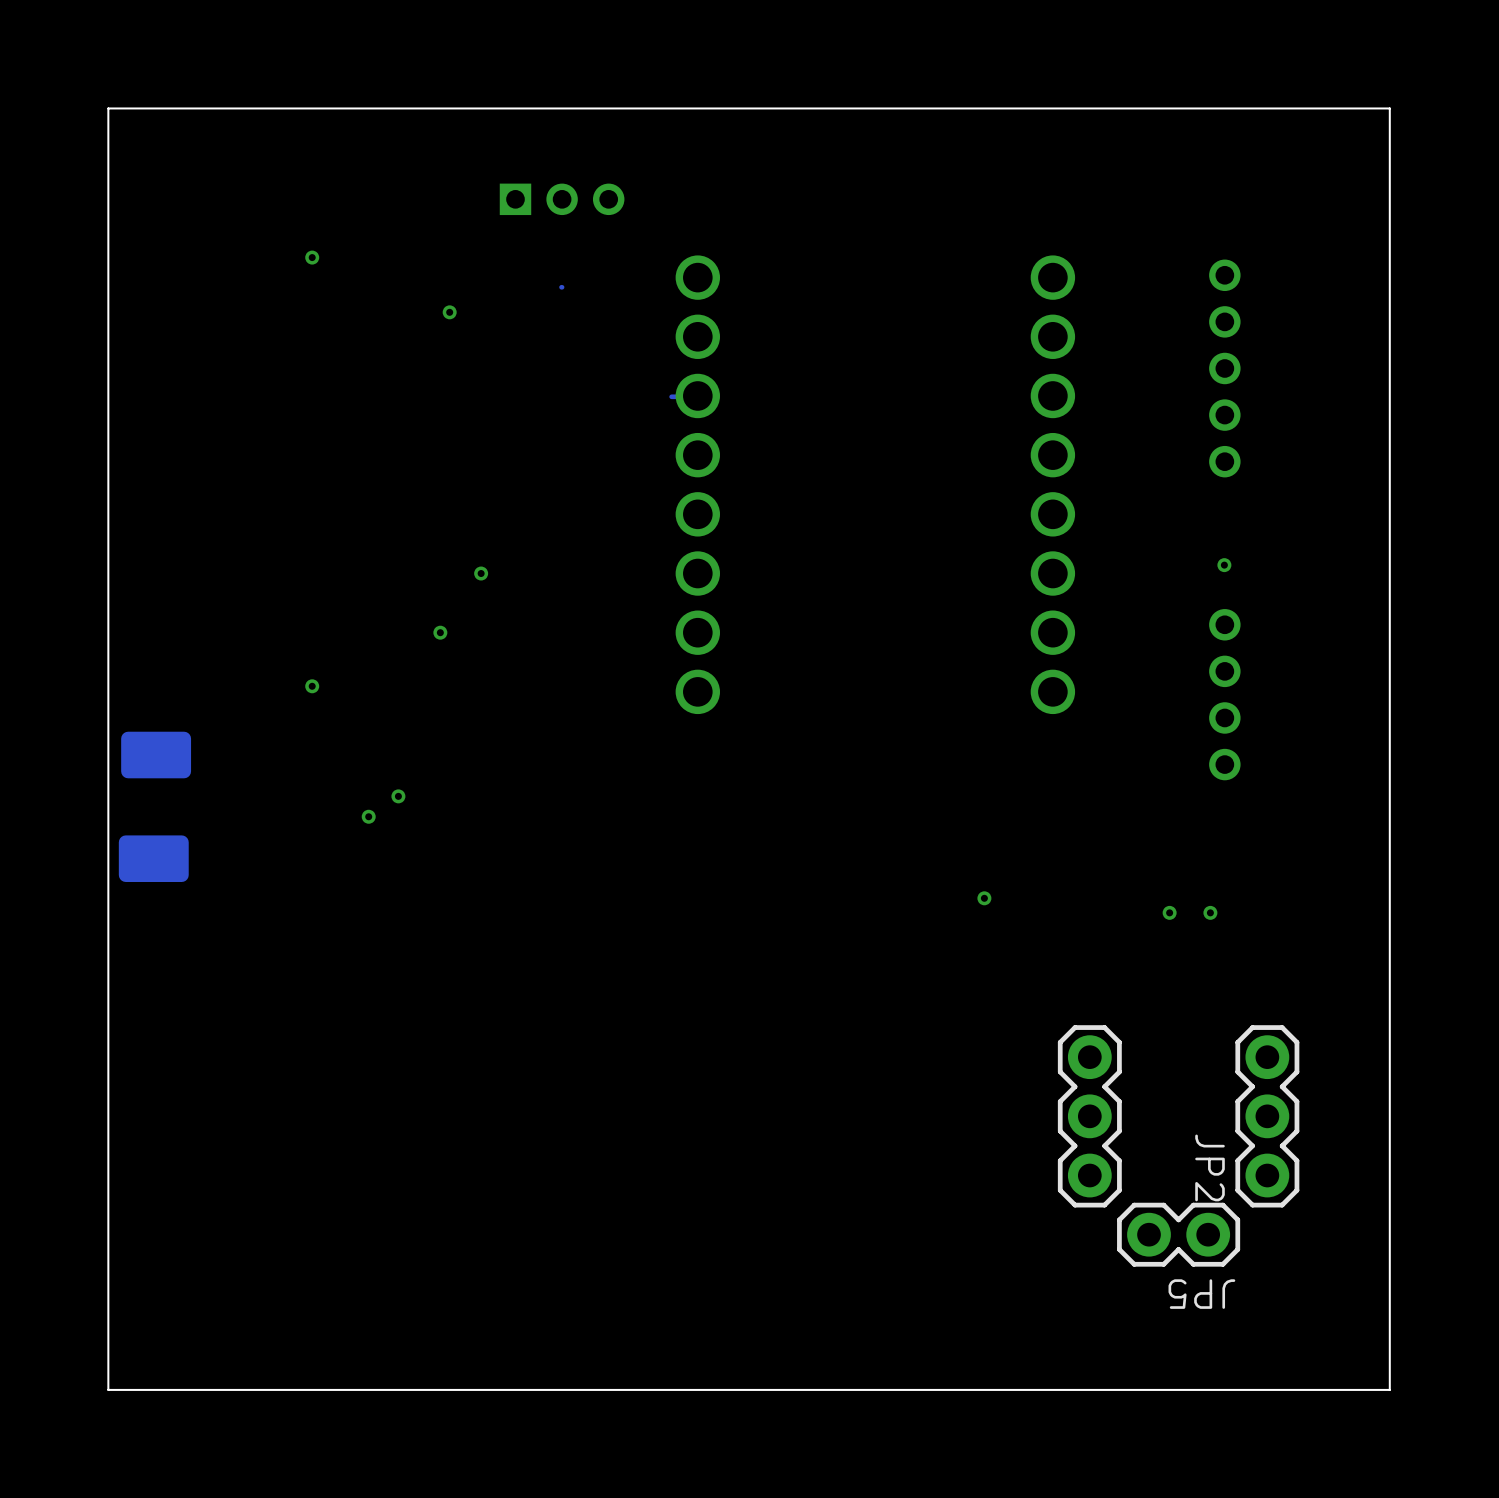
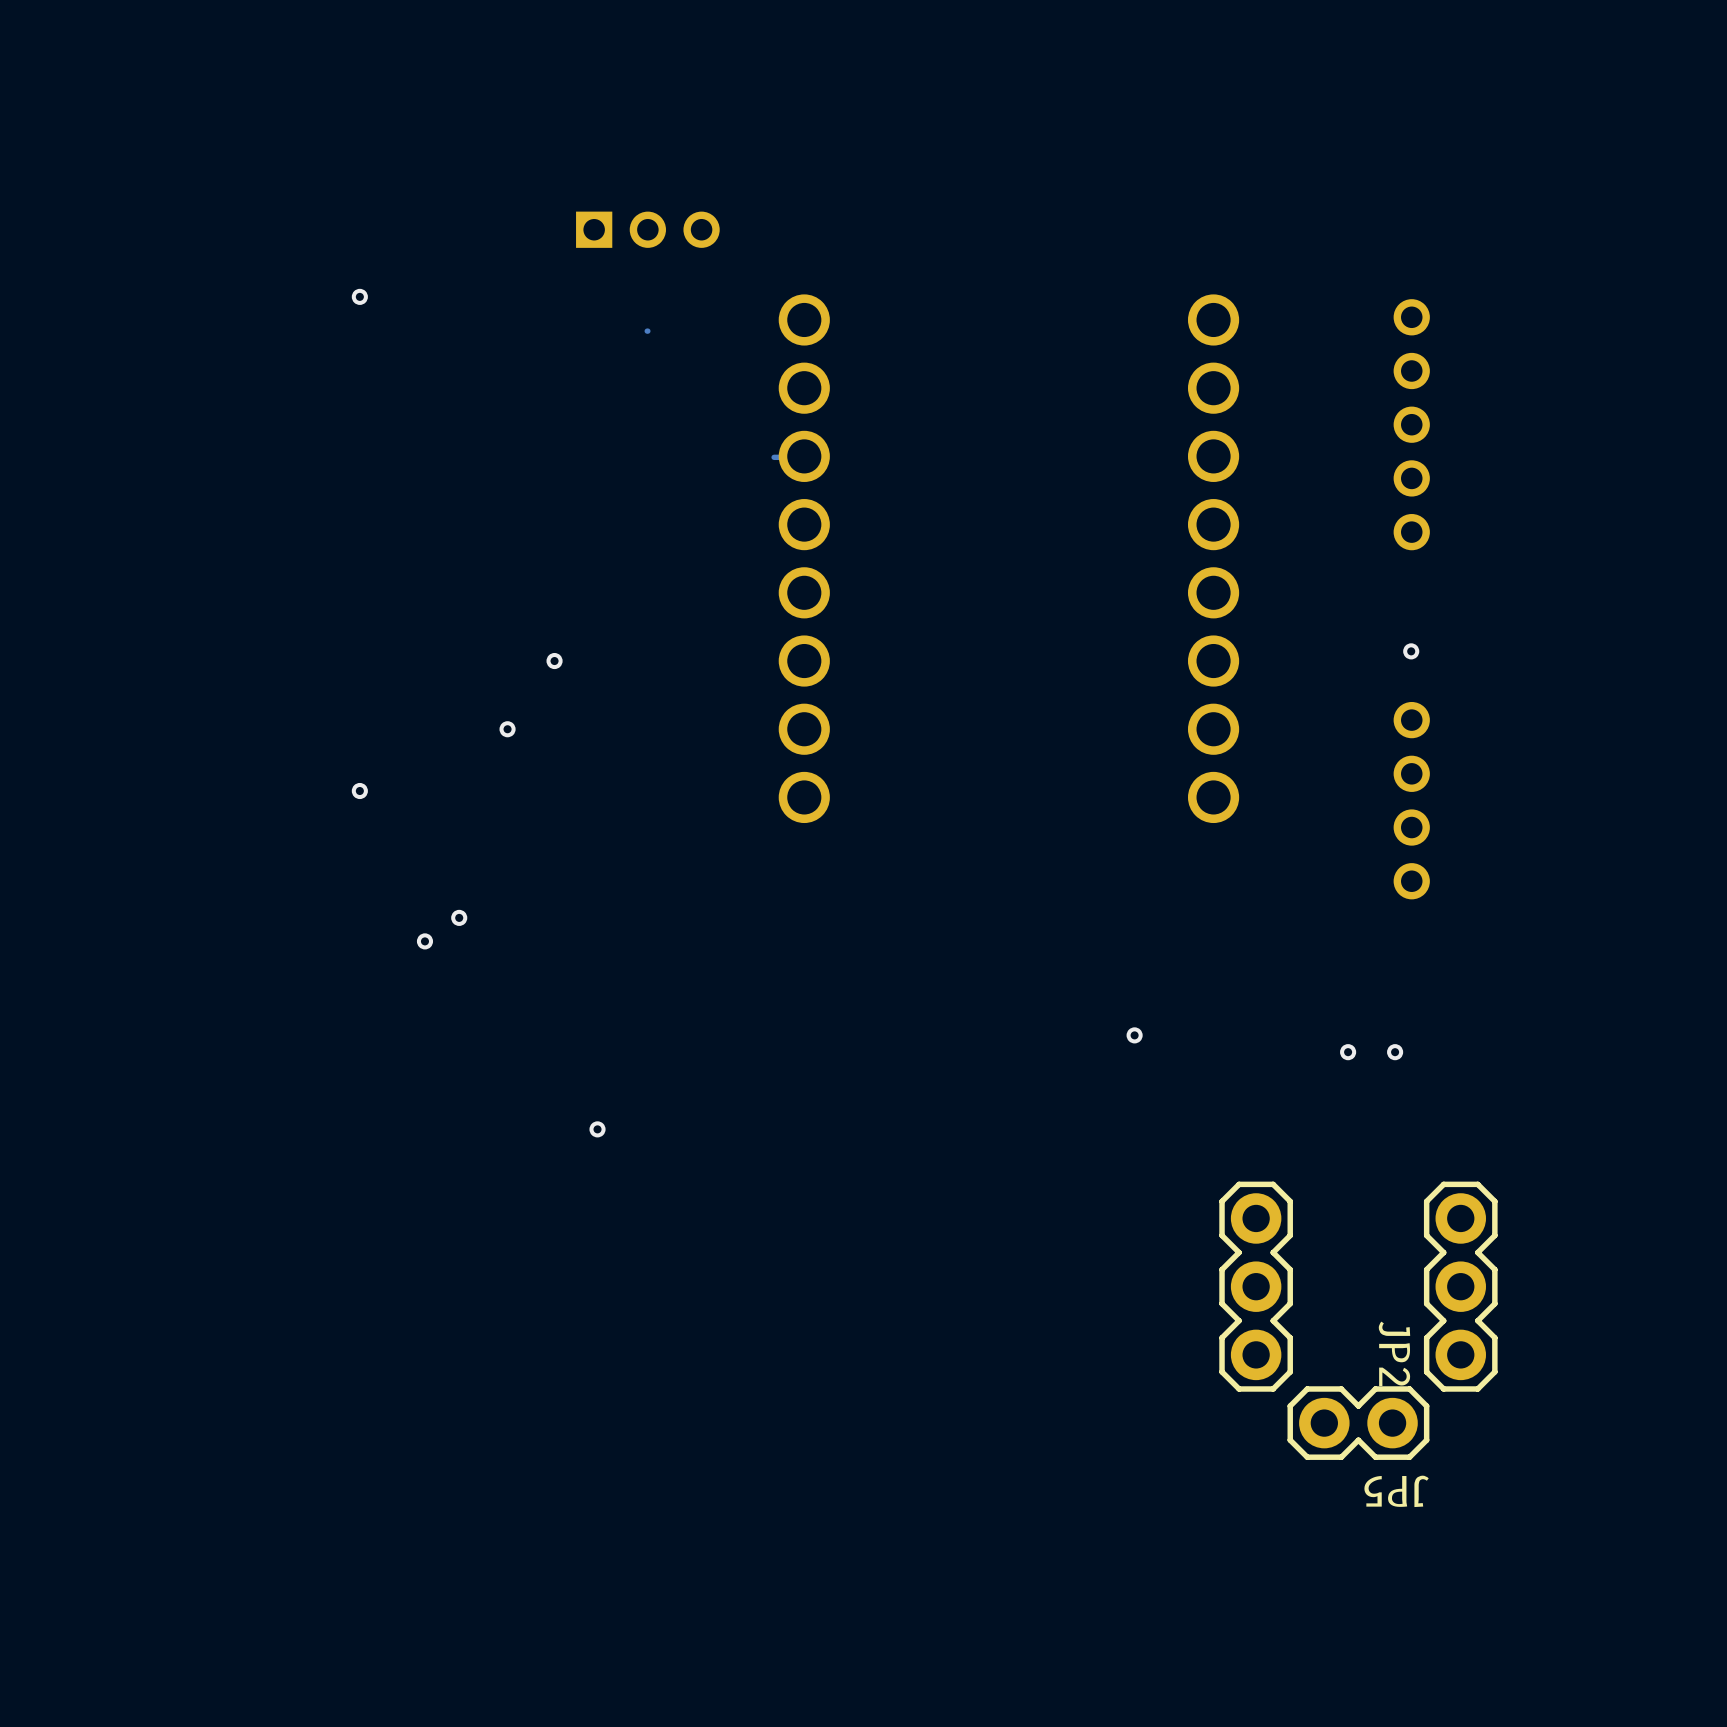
board edge: (1389, 108) (108, 108) (108, 1389) (1389, 1389) (1389, 108) -> none
via: (449, 312) -> none
part: (156, 755) -> none
part: (153, 858) -> none
via: none -> (597, 1129)

